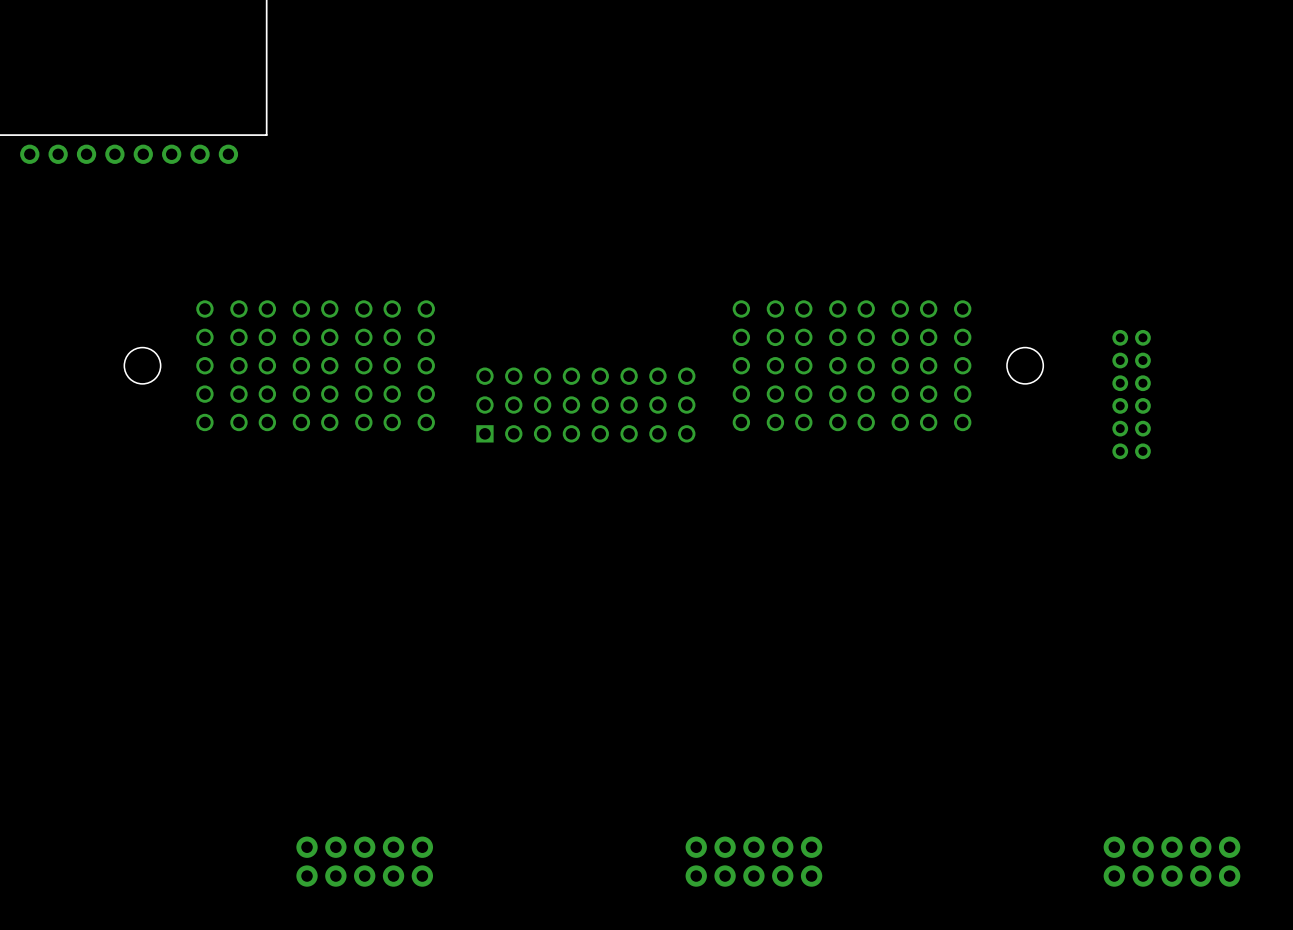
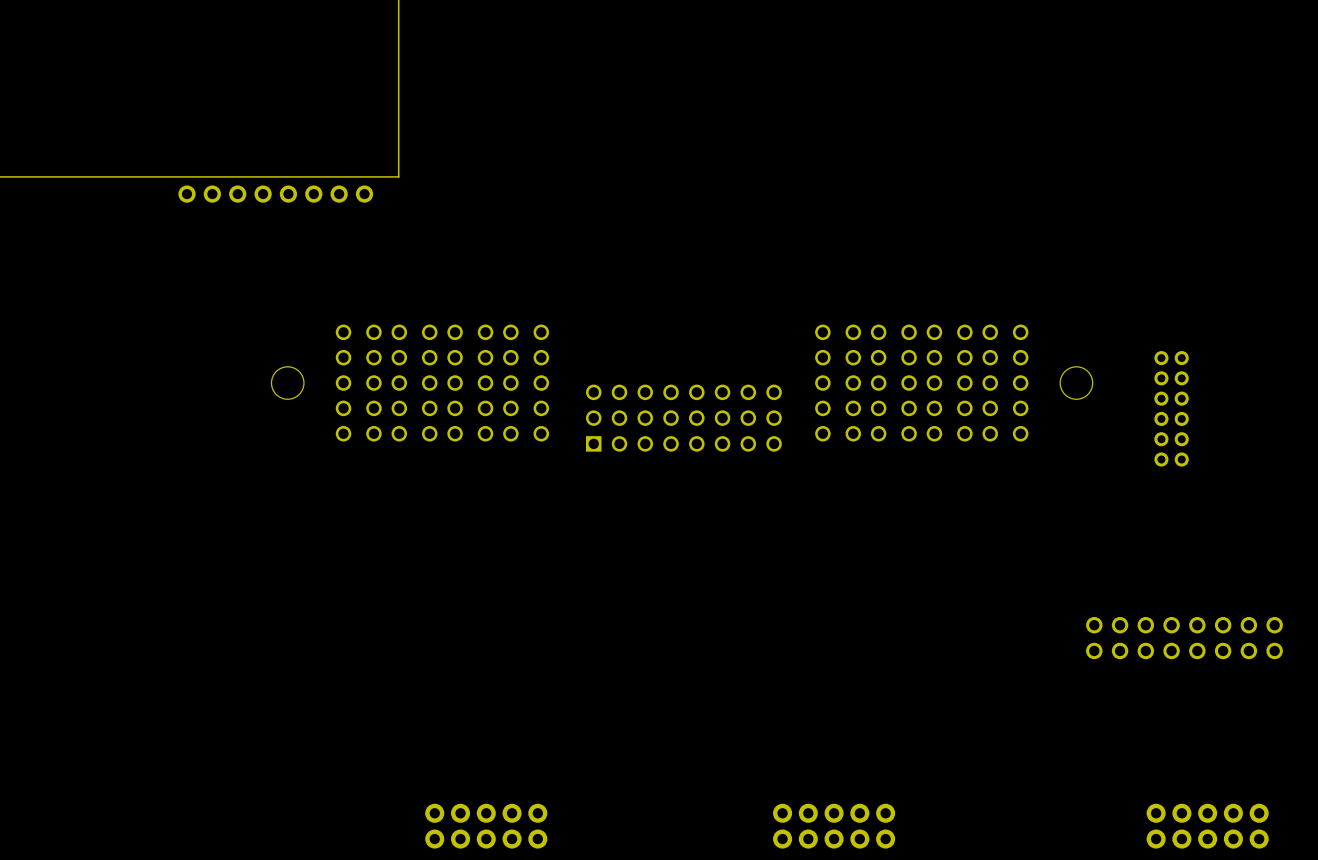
part: none -> (1184, 638)

